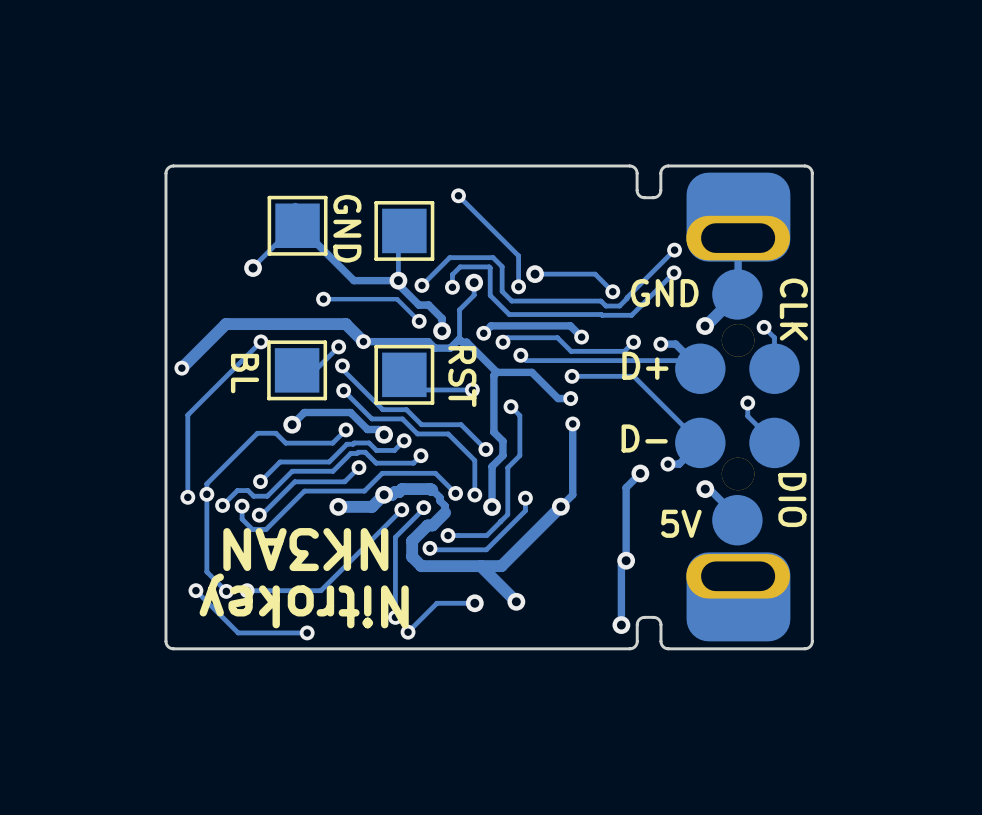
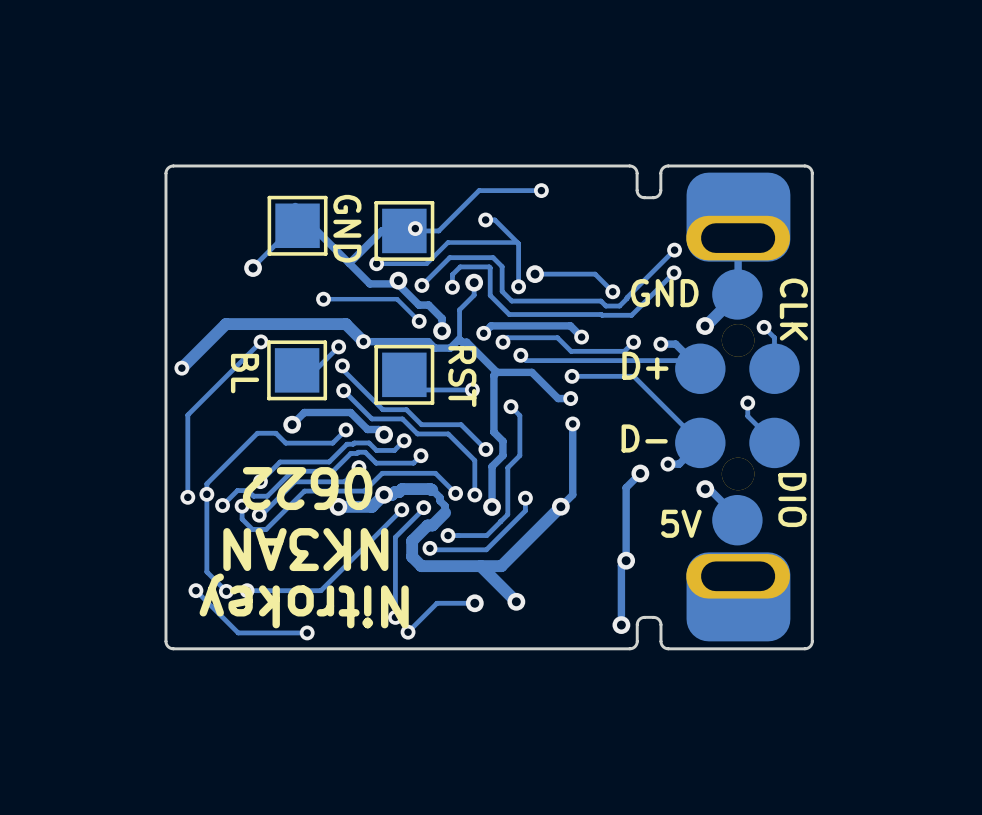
track: none -> (541, 190) (479, 190) (438, 230) (381, 230) (349, 263)
via: none -> (541, 190)
track: (458, 195) (518, 255) -> (518, 243) (518, 255)
via: (458, 195) -> none
track: (295, 209) (295, 222) (353, 280) (398, 280) (398, 230) -> (295, 209) (369, 283) (395, 283) (398, 280)
track: none -> (485, 219) (494, 219) (518, 243)
via: none -> (485, 219)
via: none -> (415, 228)
track: none -> (518, 243) (447, 242) (426, 263) (376, 263)
via: none -> (376, 263)
text: none -> 0622 (307, 488)

